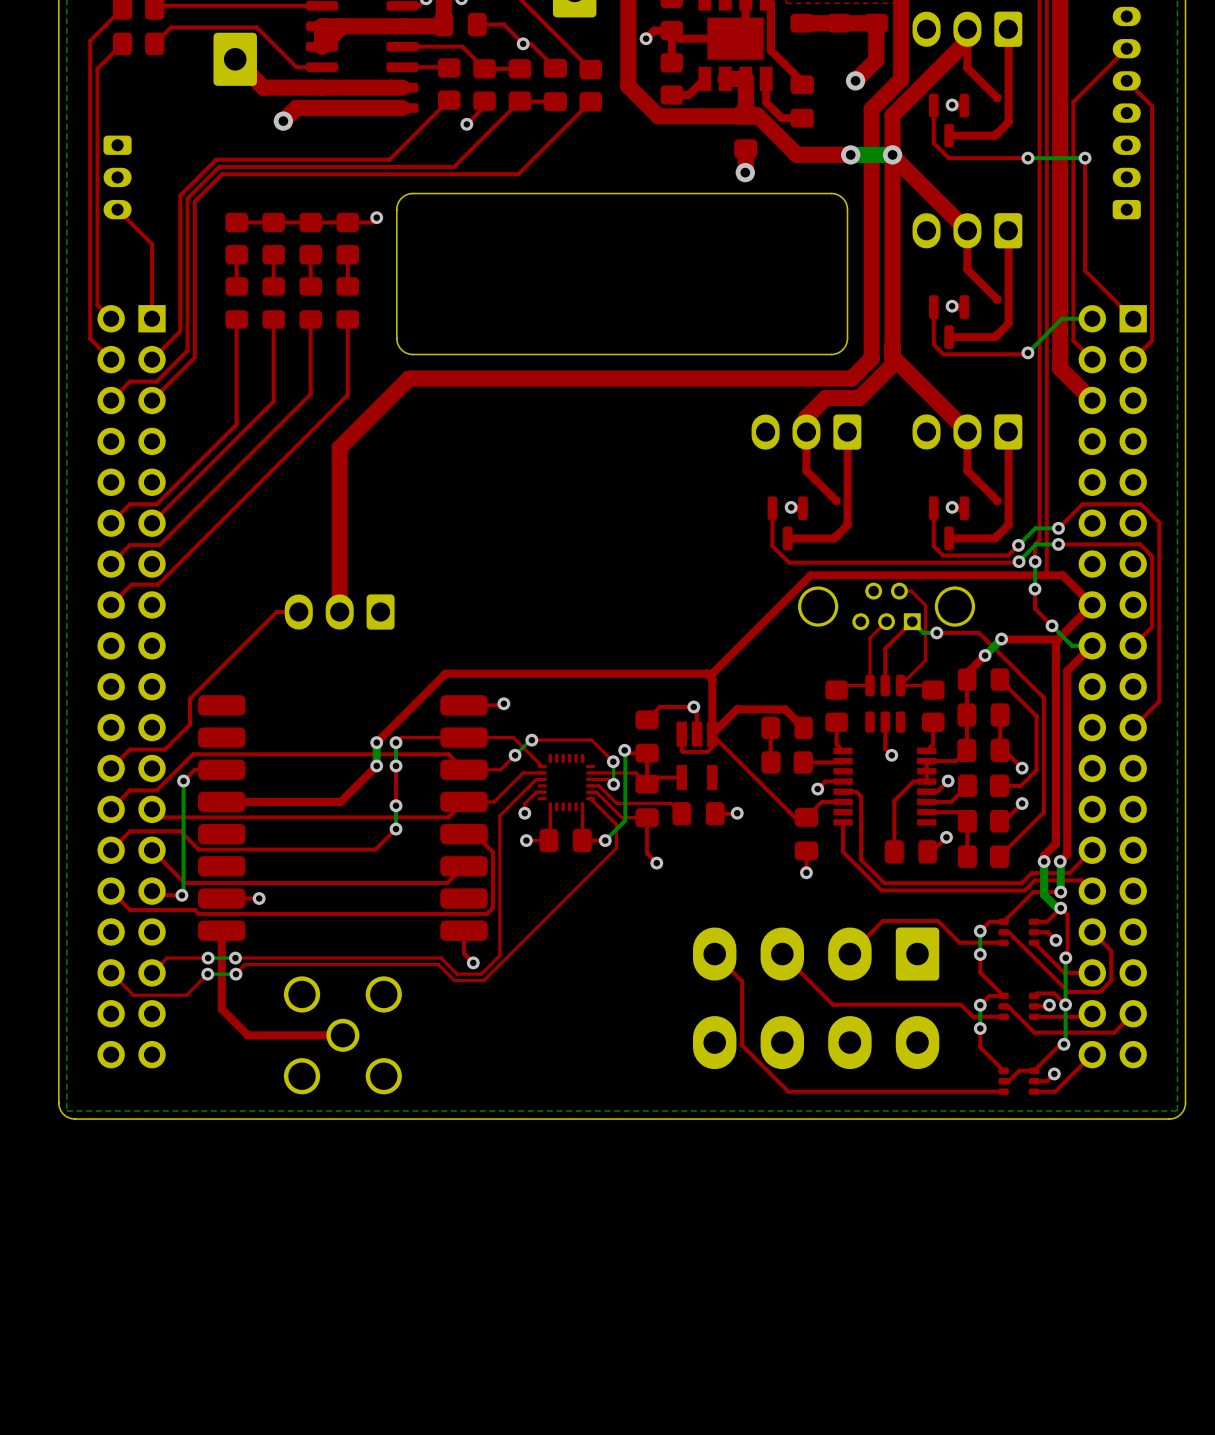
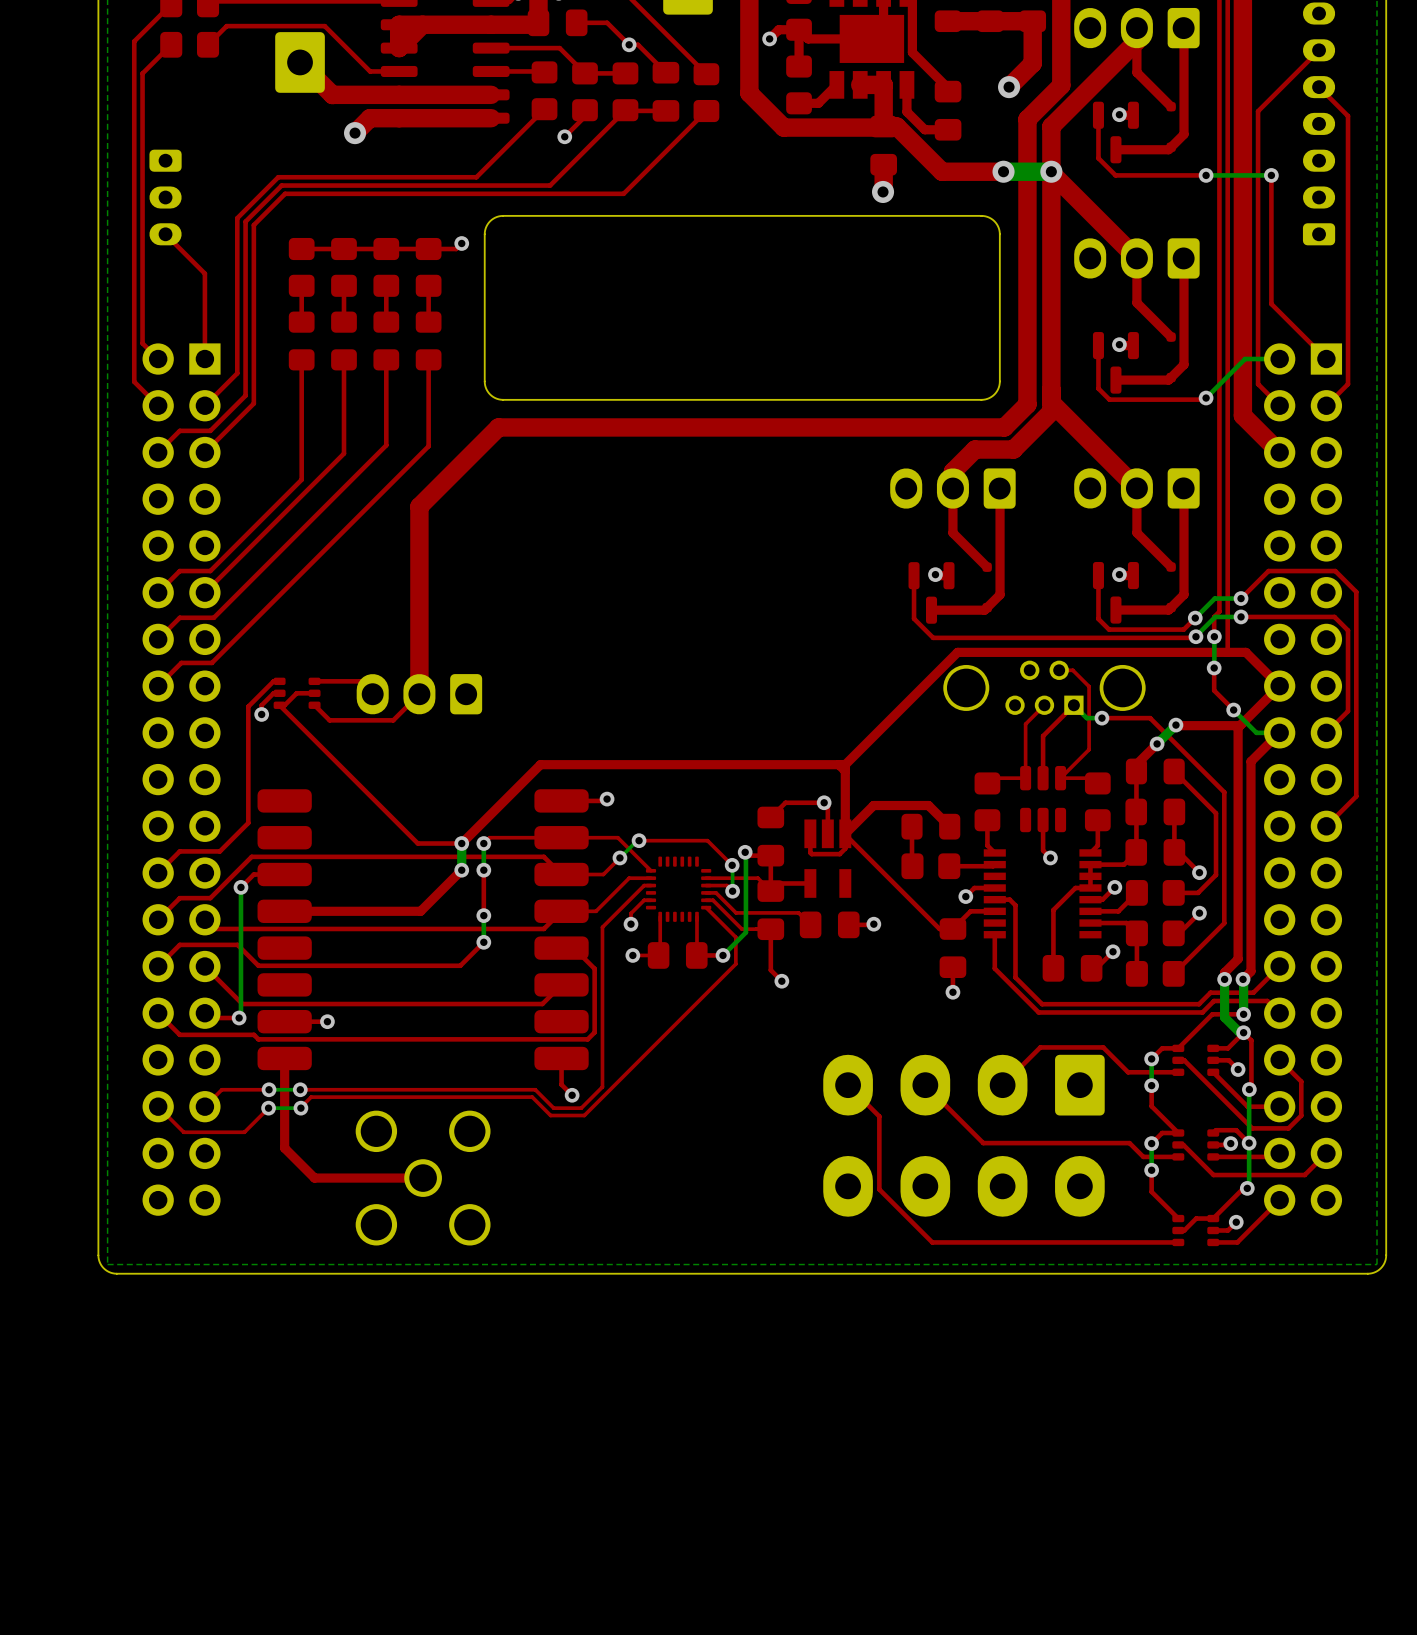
top track: none -> (314, 681) (359, 681) (372, 694)
top track: none -> (279, 693) (273, 693) (261, 705) (261, 714)
part: none -> (297, 693)
top track: none -> (314, 693) (296, 693) (284, 705) (279, 705) (417, 843) (461, 843)
top track: (298, 612) (276, 612) (190, 698) -> (279, 681) (273, 681) (248, 706) (248, 793)
top track: none -> (419, 694) (393, 720) (329, 720) (314, 705)
via: none -> (261, 714)

